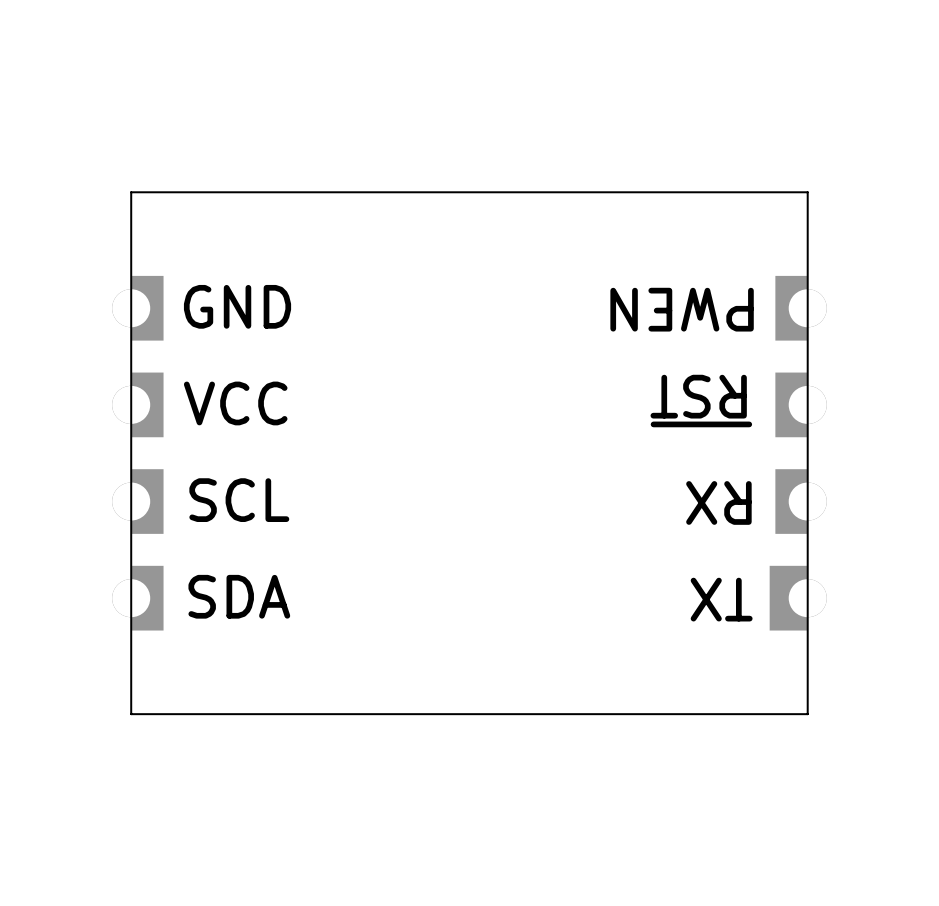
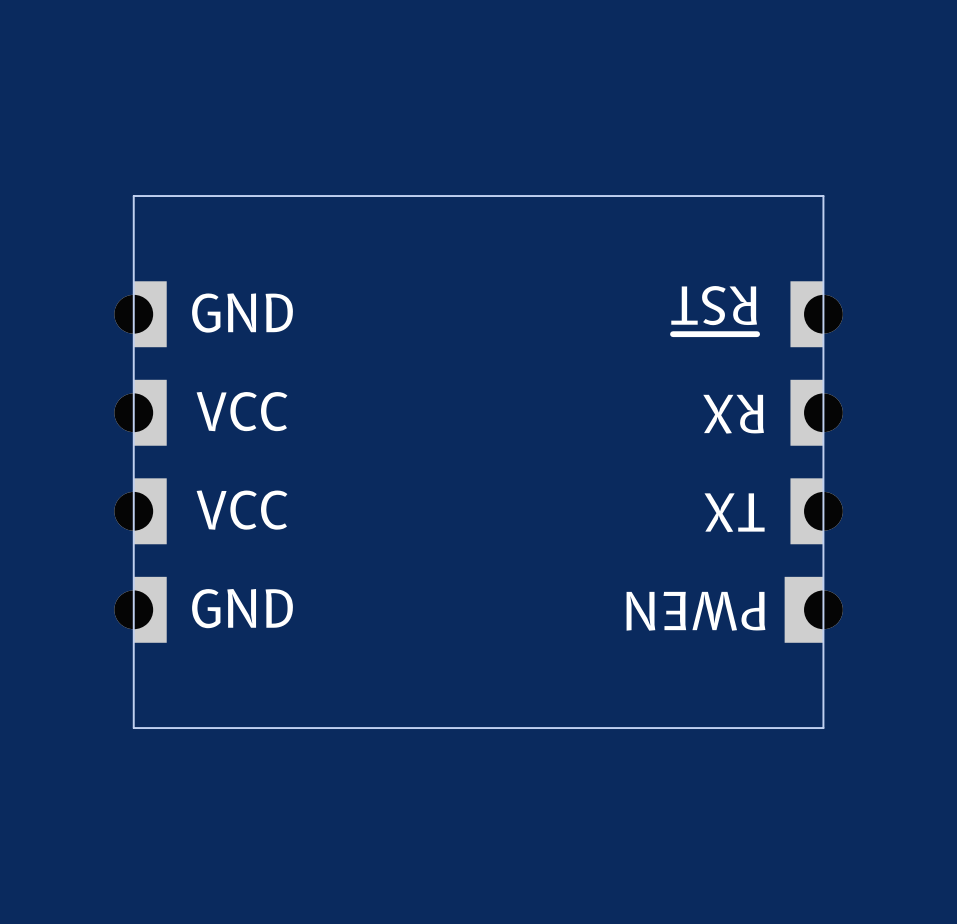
text: PWEN (682, 309) -> ~{RST} (714, 310)
text: ~{RST} (701, 401) -> RX (733, 414)
text: SCL (239, 500) -> VCC (242, 510)
text: RX (718, 502) -> TX (734, 512)
text: SDA (239, 596) -> GND (242, 608)
text: none -> PWEN (695, 611)
text: TX (721, 599) -> none

